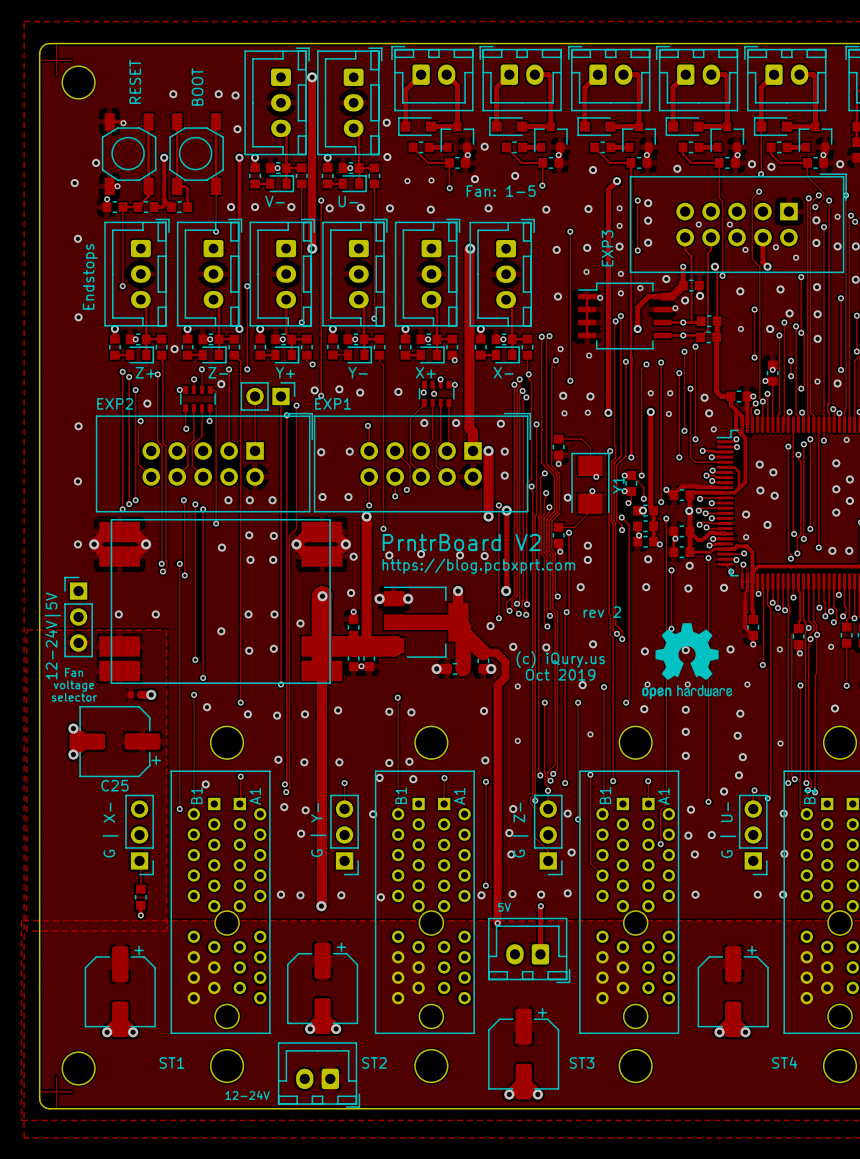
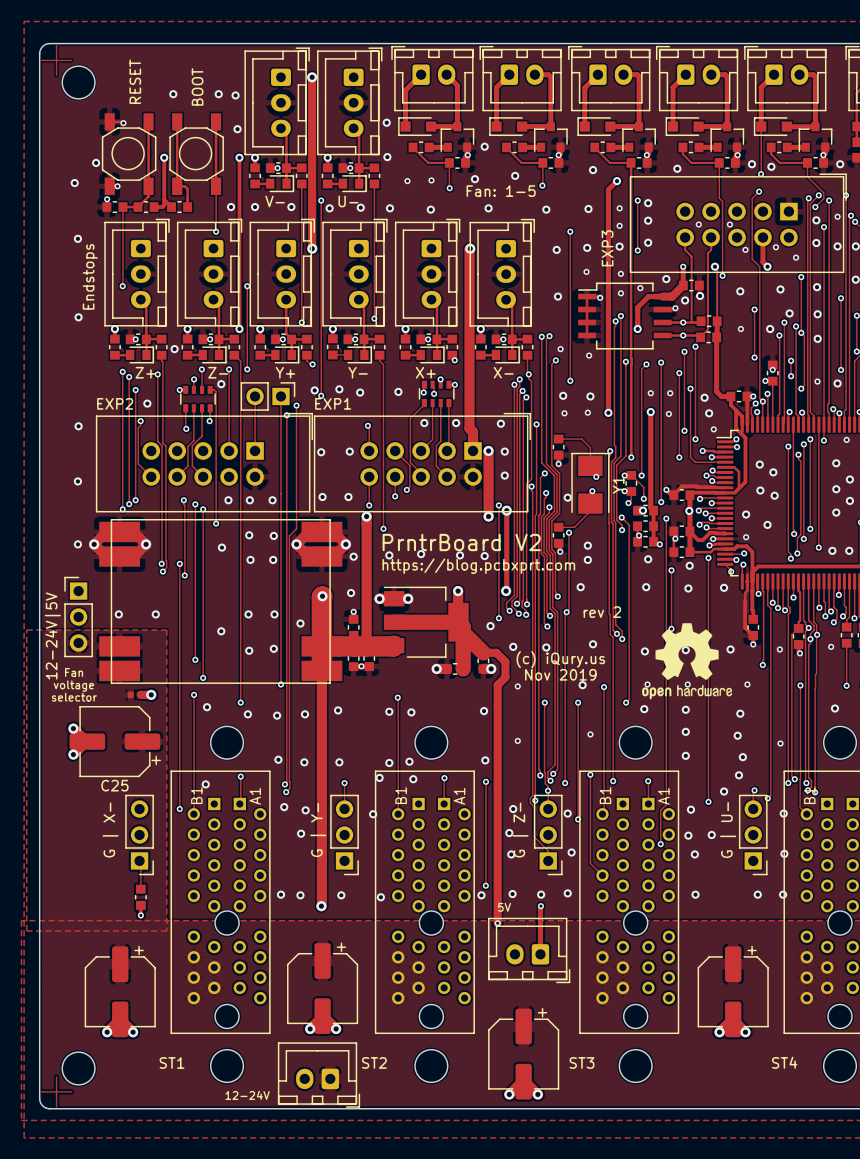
text: Oct 2019 (560, 674) -> Nov 2019 (560, 674)

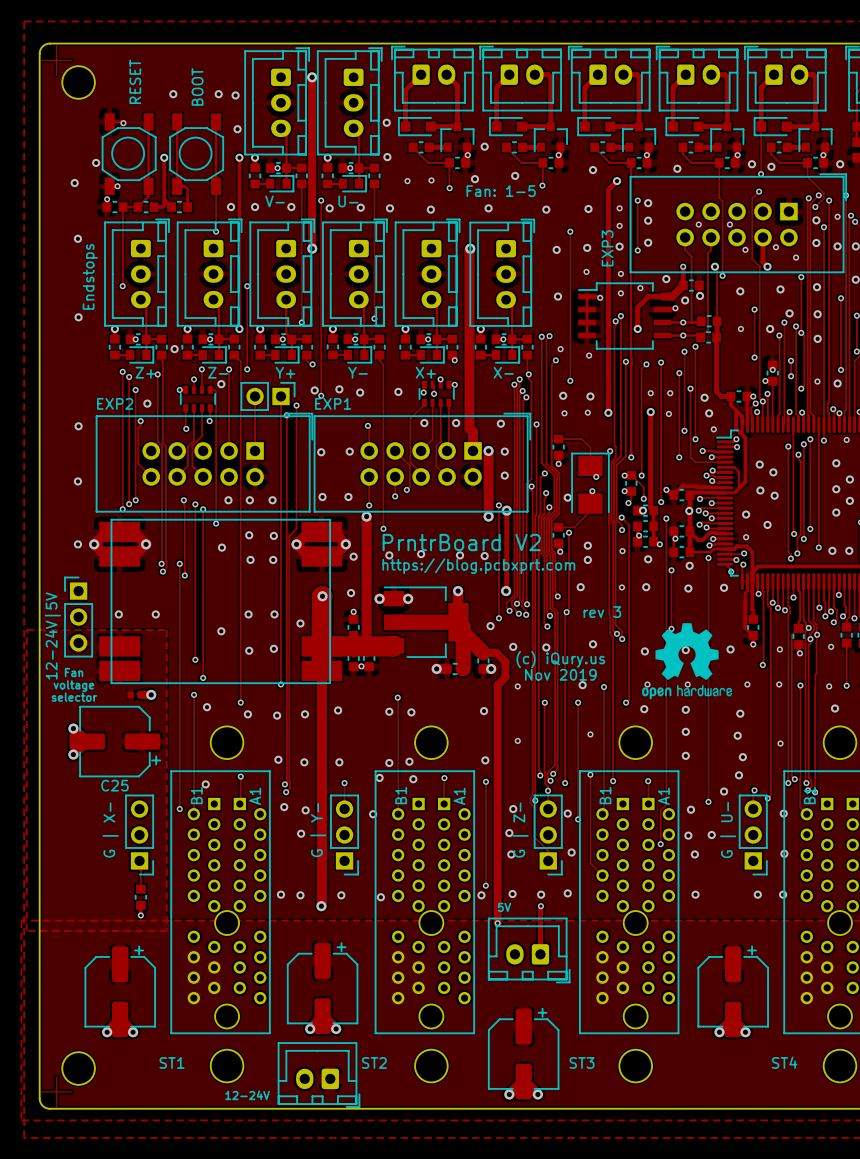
Y1 name: Y1 (618, 485) -> none
via: none -> (622, 551)
via: none -> (621, 587)
text: rev 2 (602, 612) -> rev 3 (602, 612)
via: none -> (779, 684)
via: none -> (829, 686)

